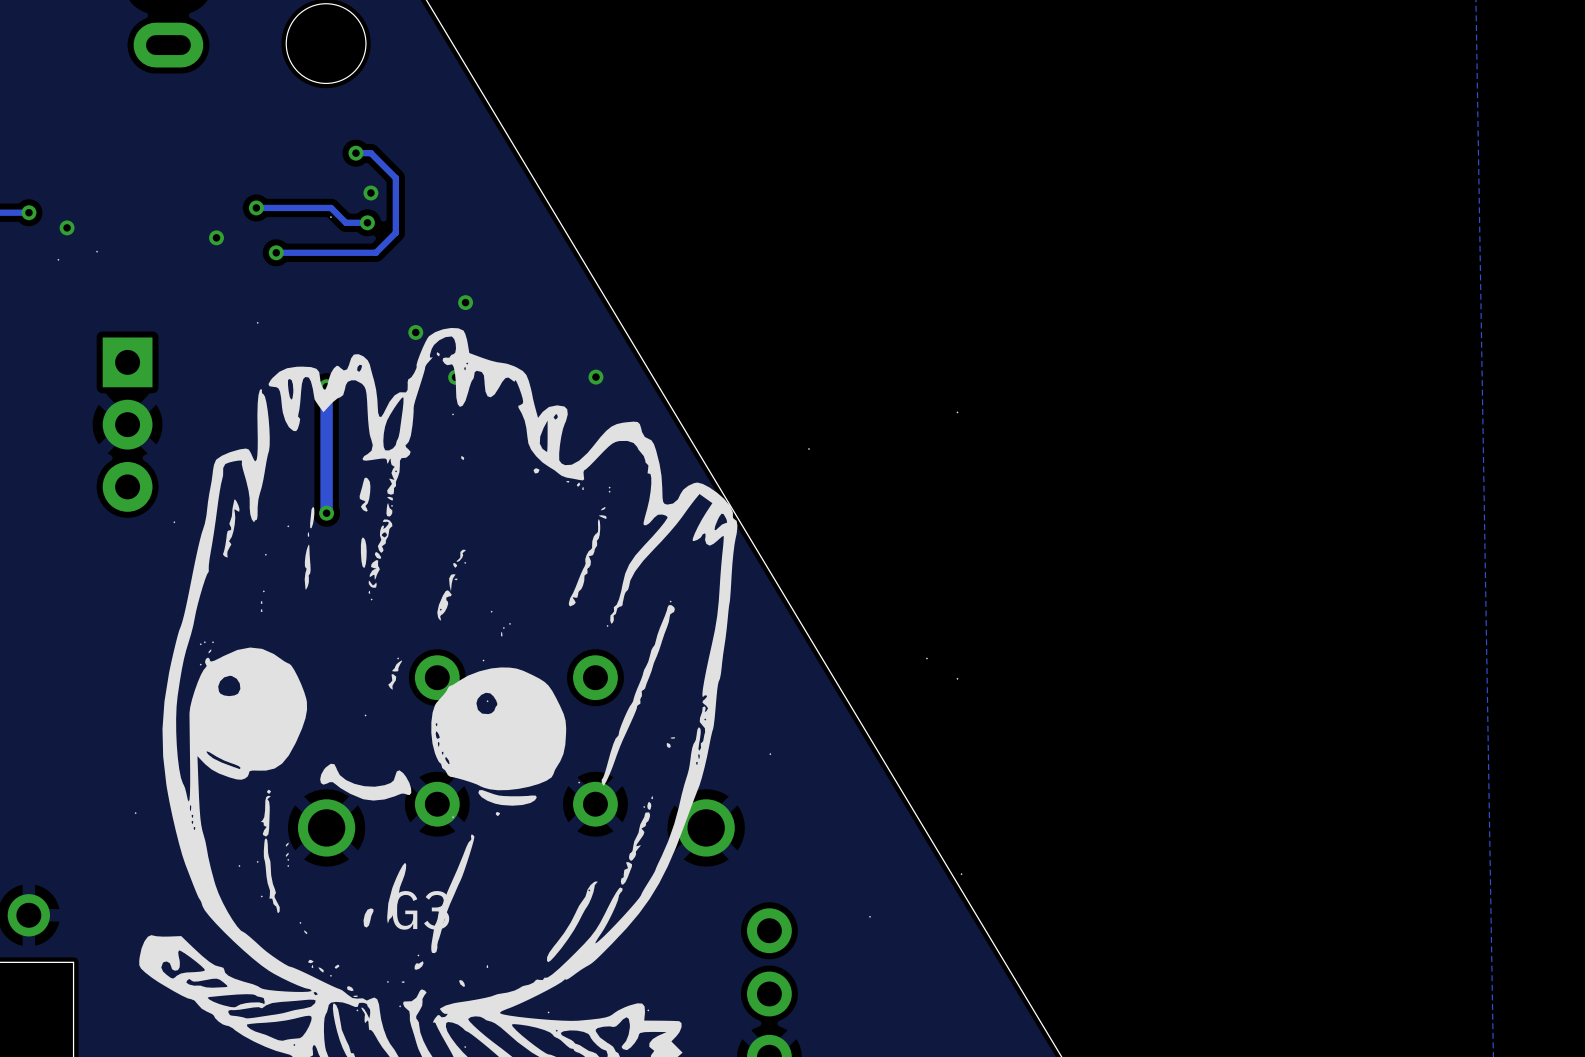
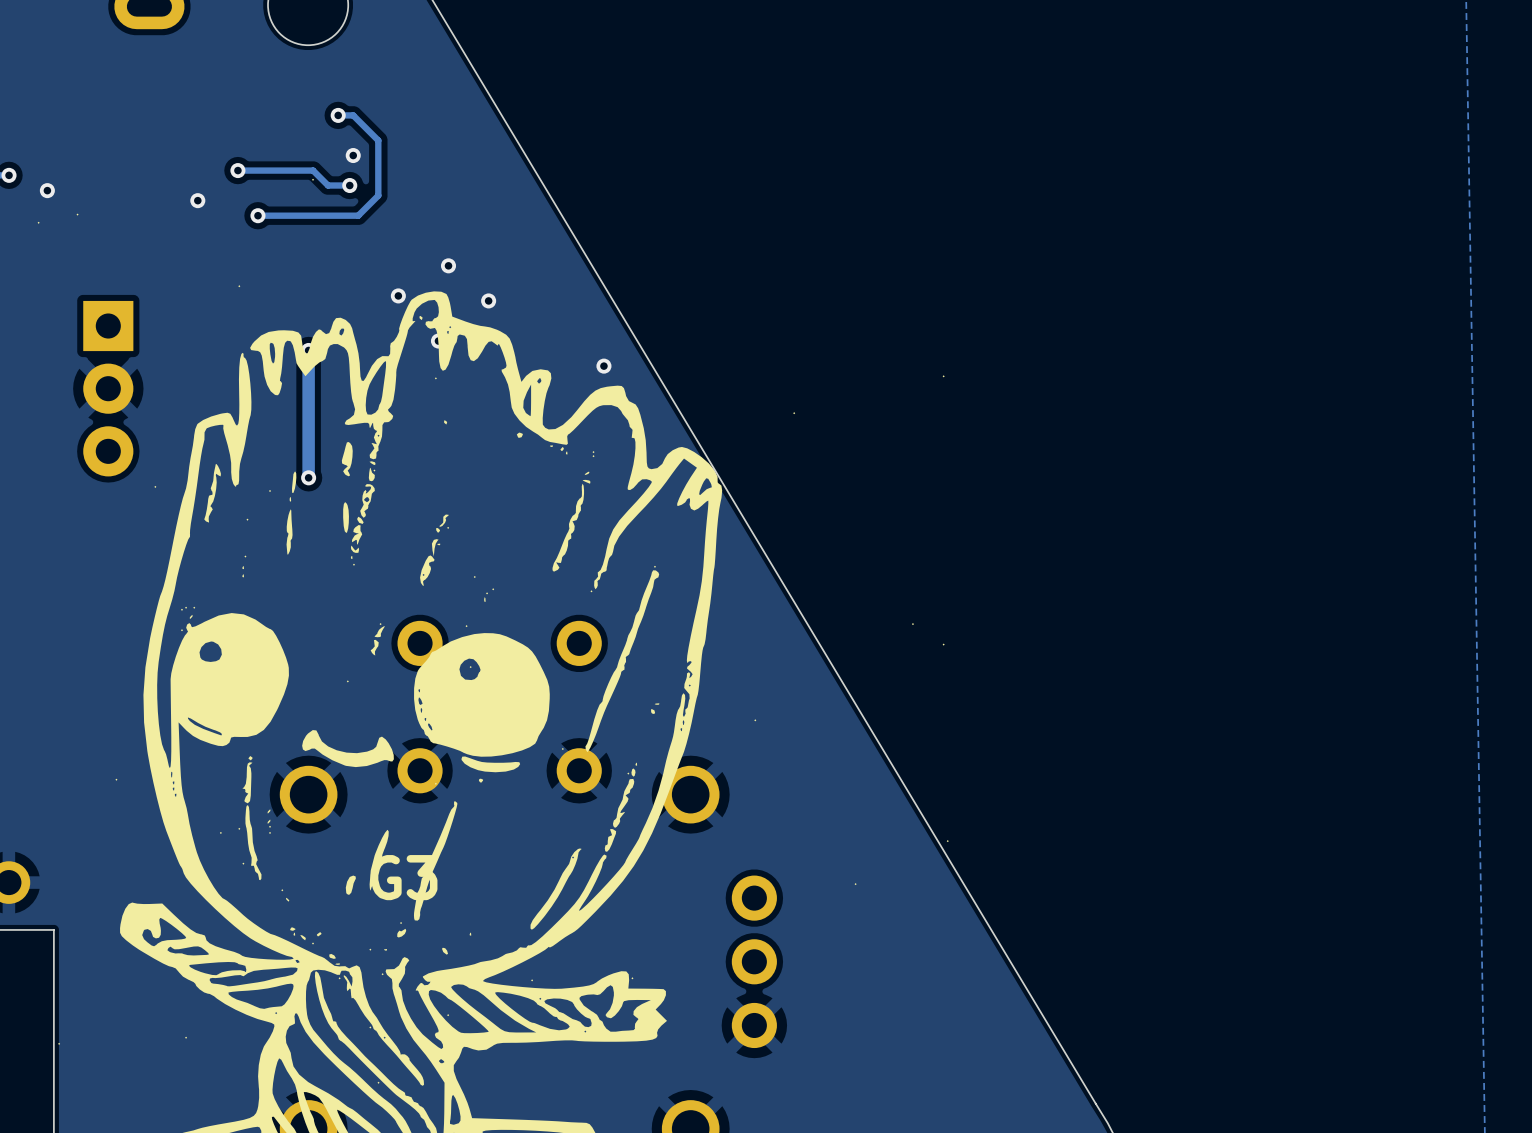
via: none -> (488, 300)
via position: (595, 377) -> (603, 366)

